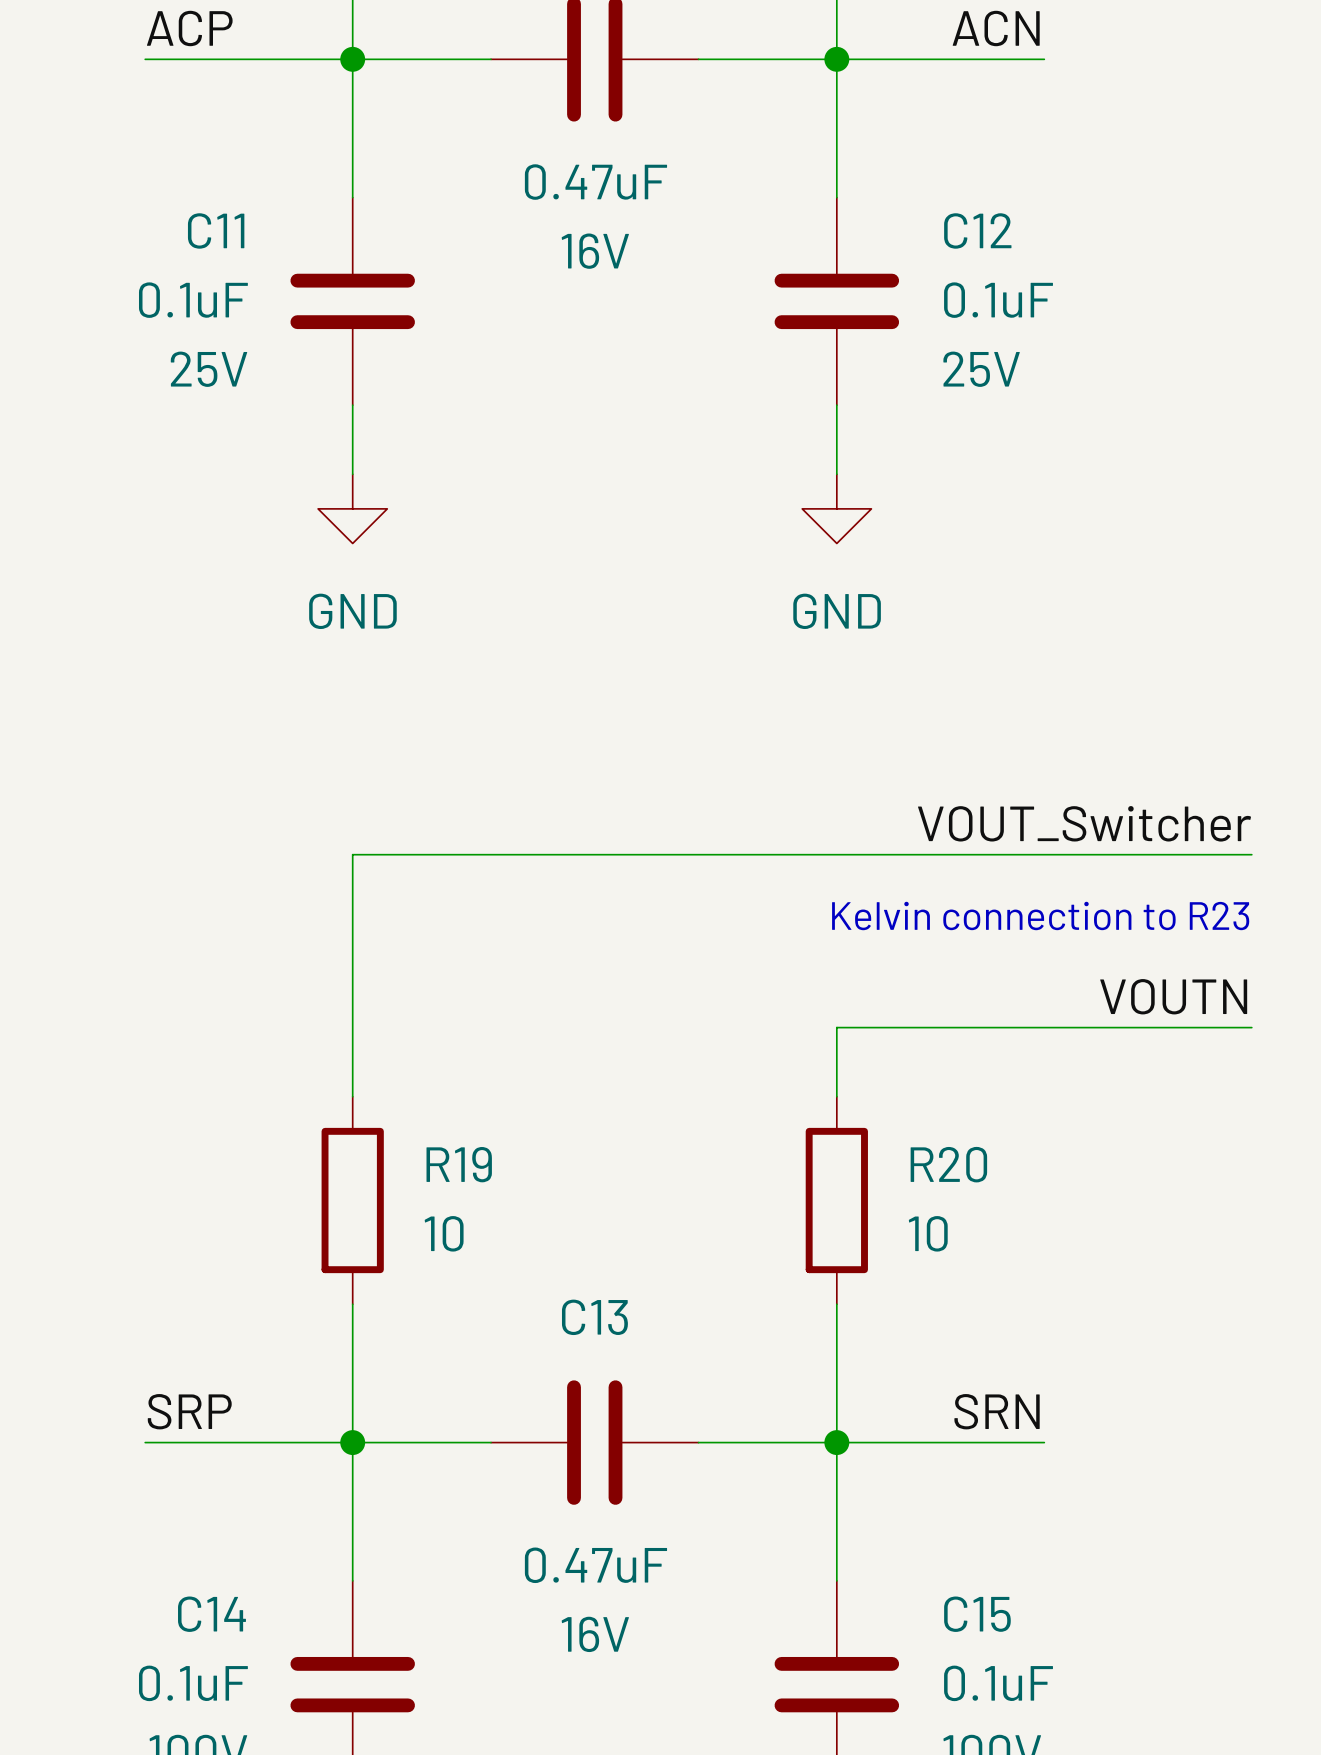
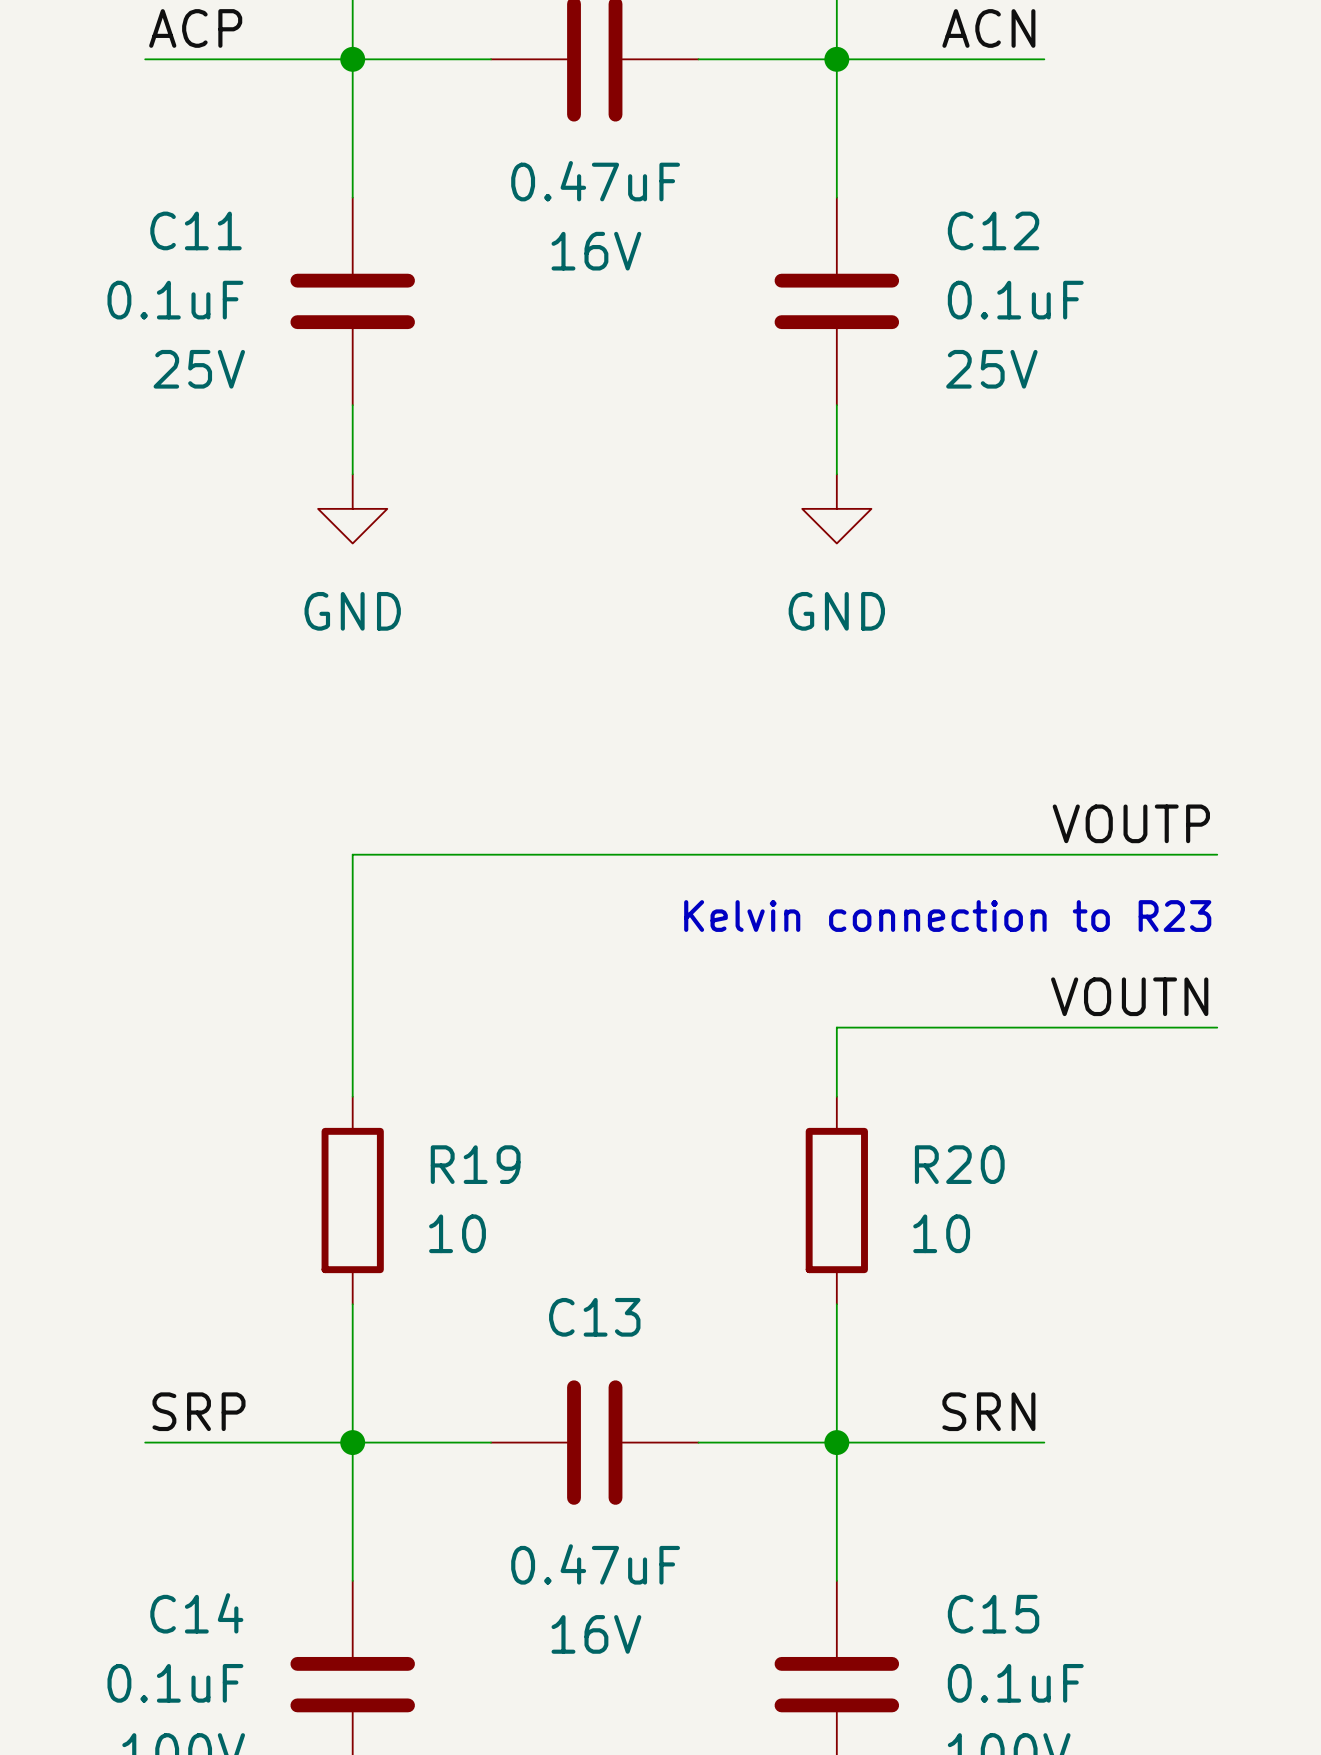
label: VOUT_Switcher (1084, 823) -> none
label: none -> VOUTP (1131, 823)
wire: (1217, 854) (1251, 854) -> none
text position: Kelvin connection to R23 (1040, 916) -> Kelvin connection to R23 (947, 916)
label position: VOUTN (1173, 996) -> VOUTN (1129, 996)
wire: (1217, 1027) (1251, 1027) -> none

